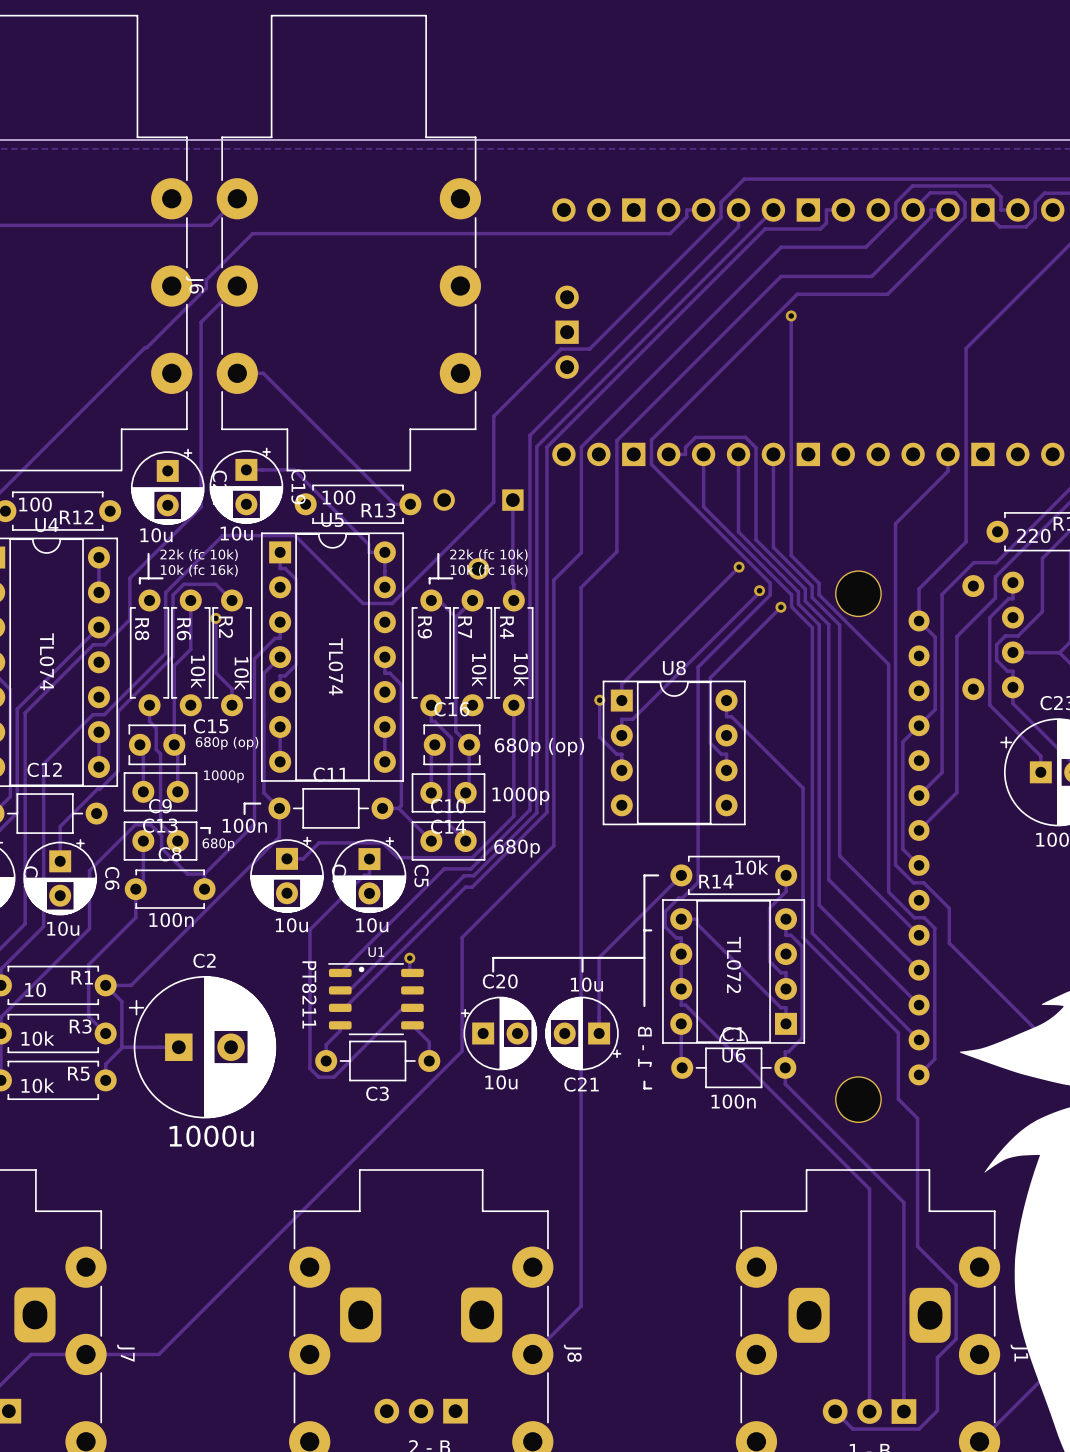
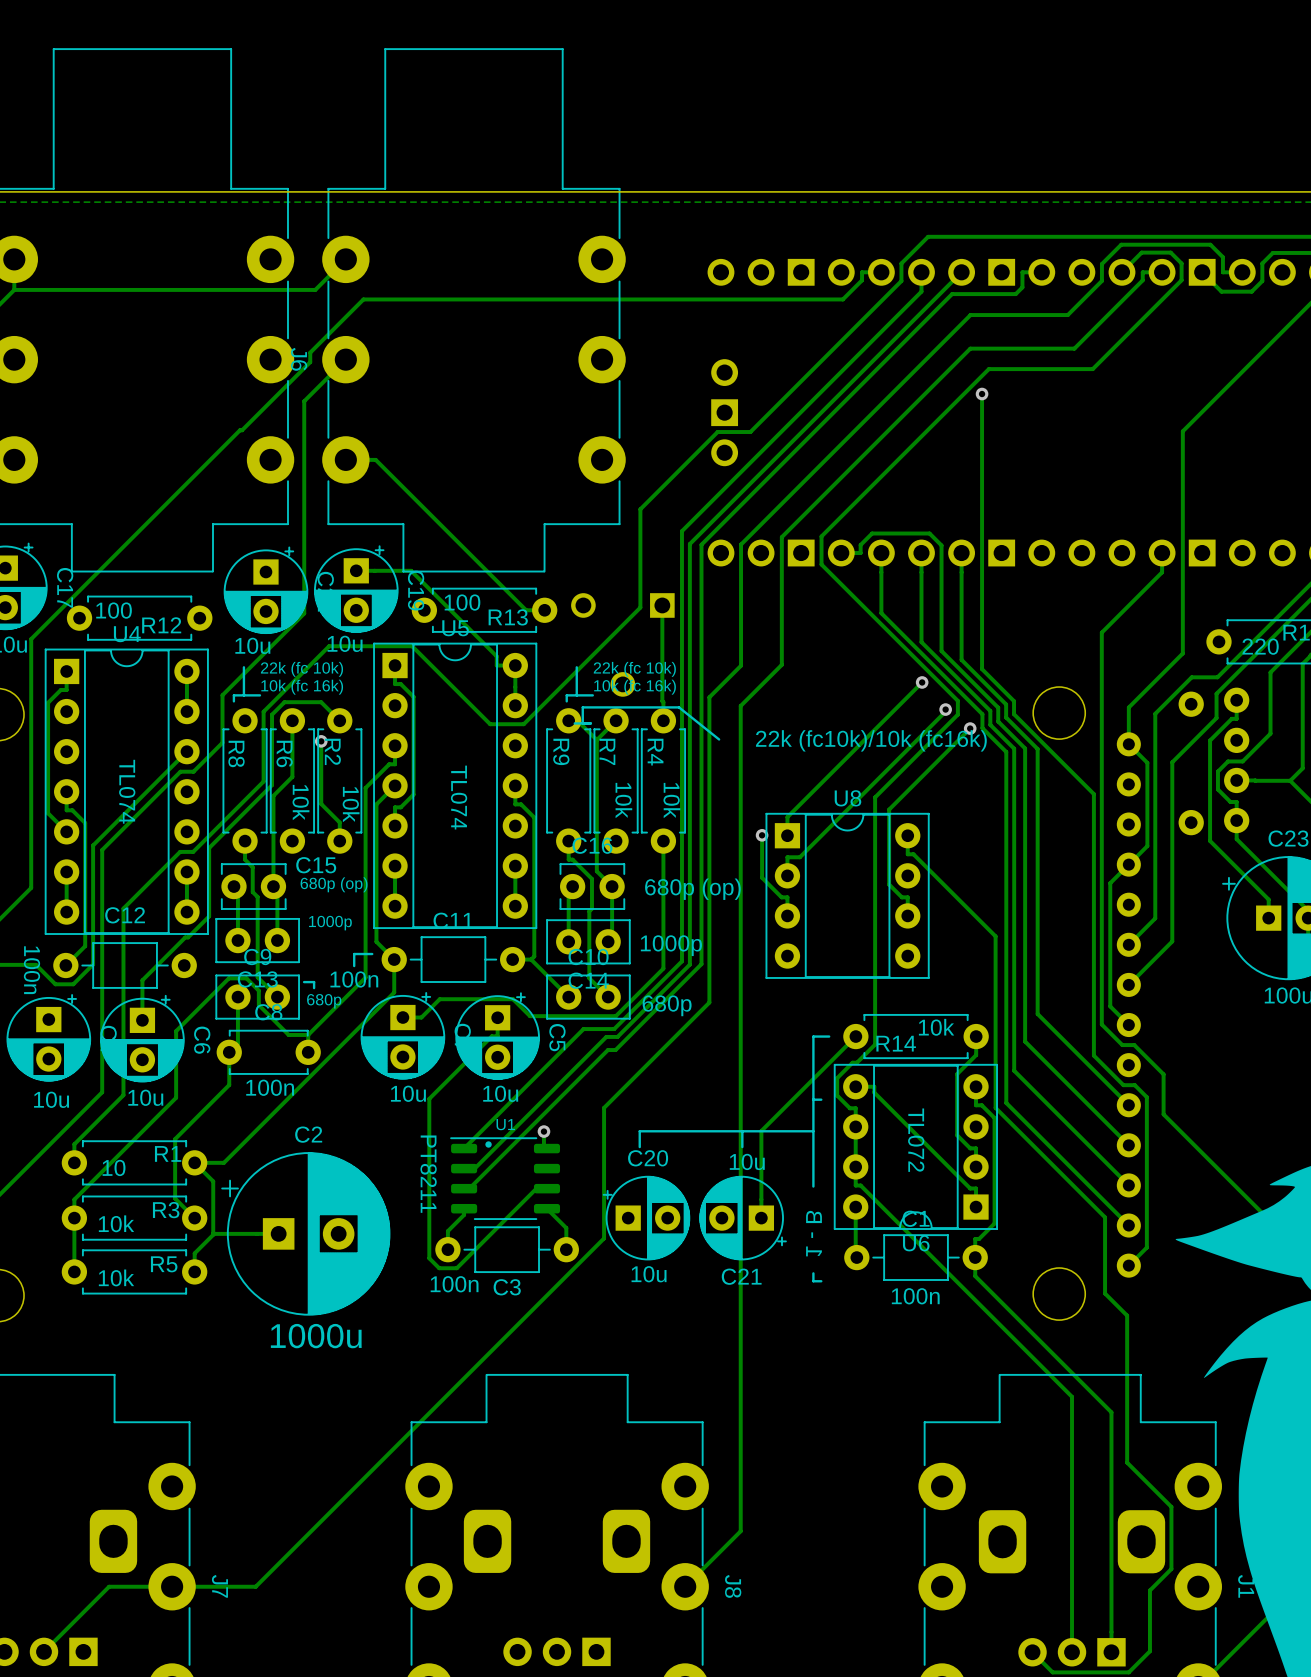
line: none -> (582, 723) (582, 707) (679, 707) (719, 739)
line: none -> (590, 723) (574, 723)
R9 value: none -> 22k (fc10k)/10k (fc16k) (871, 740)
C3 value: none -> 100n (454, 1284)

